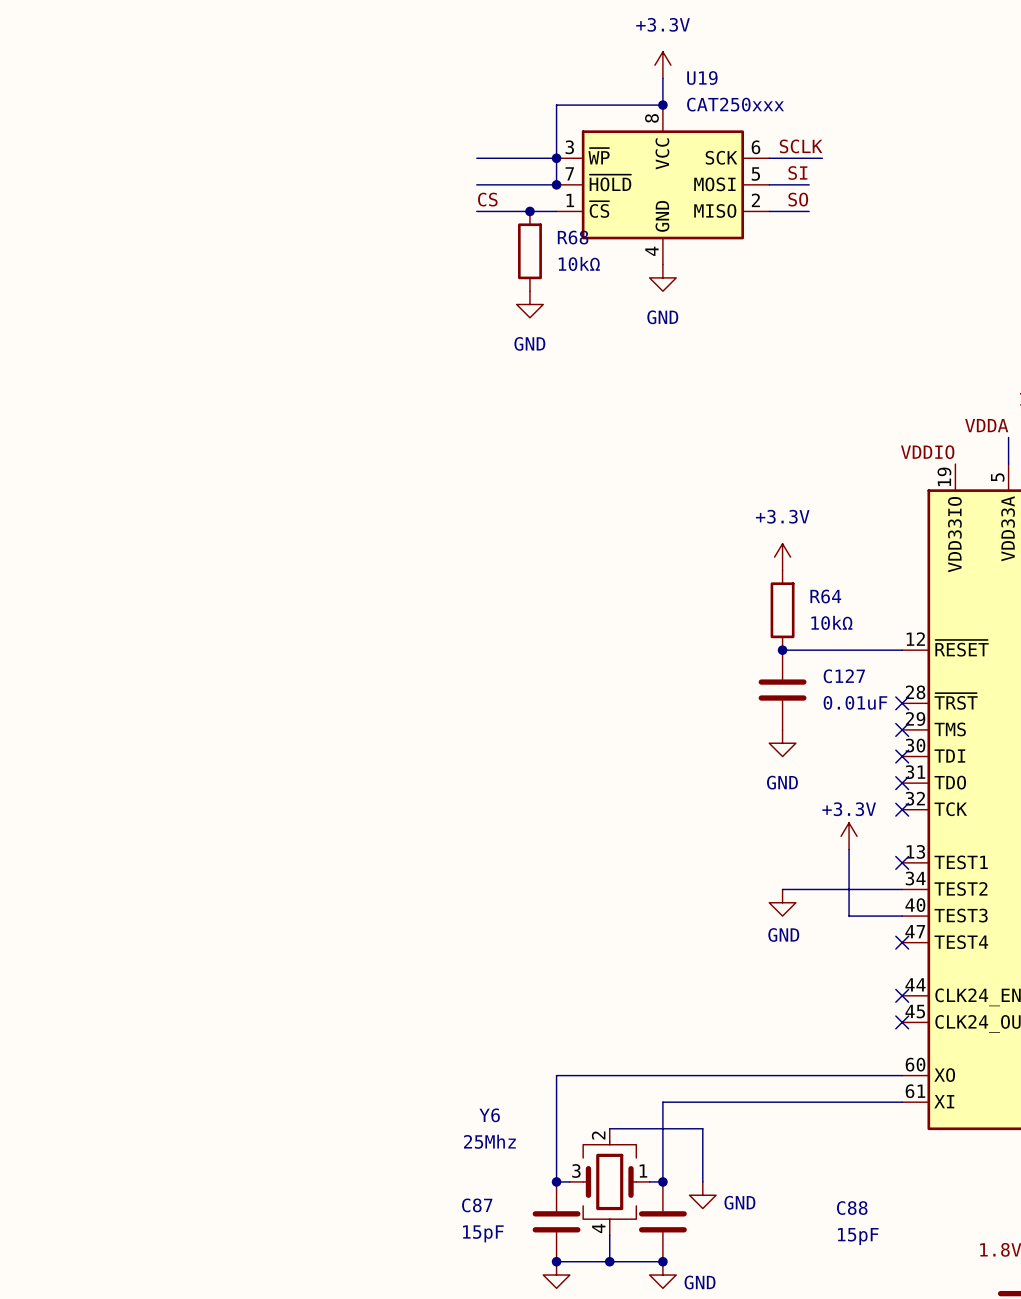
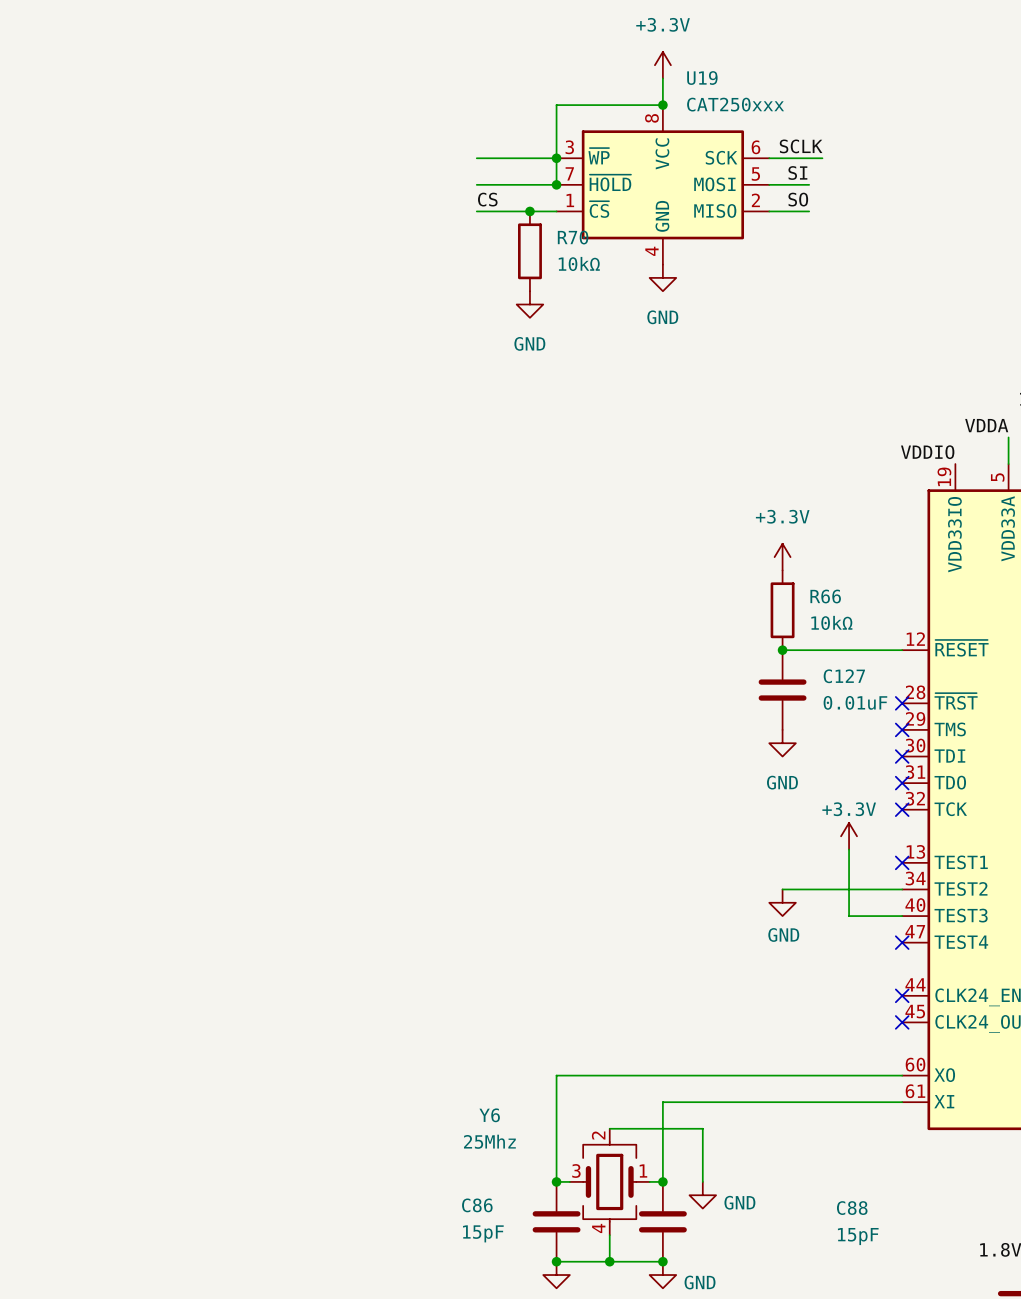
R68 name: R68 (573, 237) -> R70 (573, 237)
R64 name: R64 (825, 596) -> R66 (825, 596)
C87 name: C87 (477, 1205) -> C86 (477, 1205)

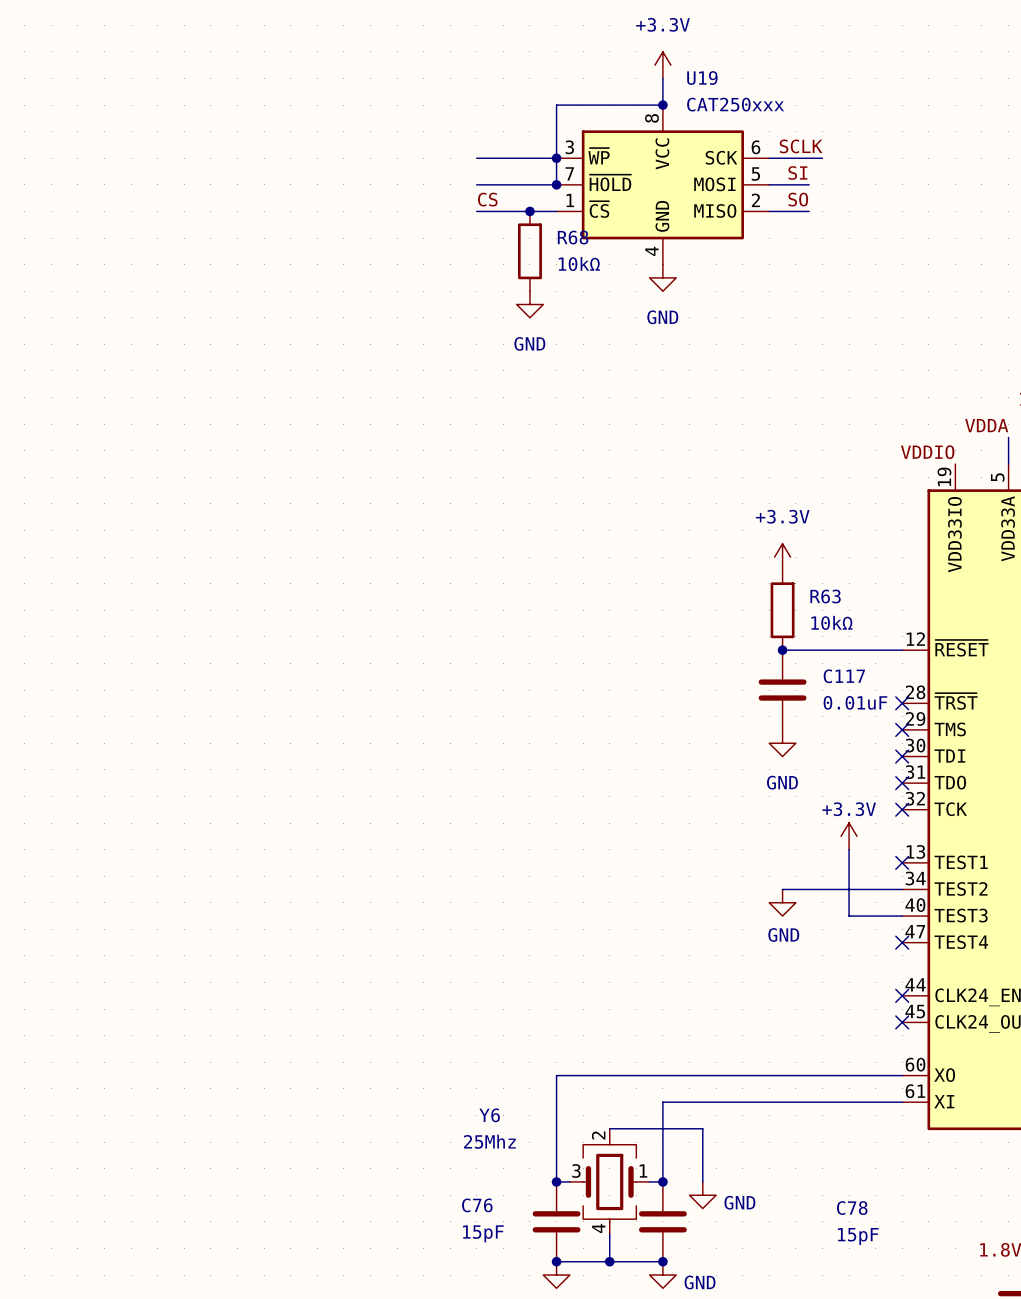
R70 name: R70 (573, 237) -> R68 (573, 237)
R66 name: R66 (825, 596) -> R63 (825, 596)
C127 name: C127 (844, 676) -> C117 (844, 676)
C86 name: C86 (477, 1205) -> C76 (477, 1205)
C88 name: C88 (852, 1208) -> C78 (852, 1208)

